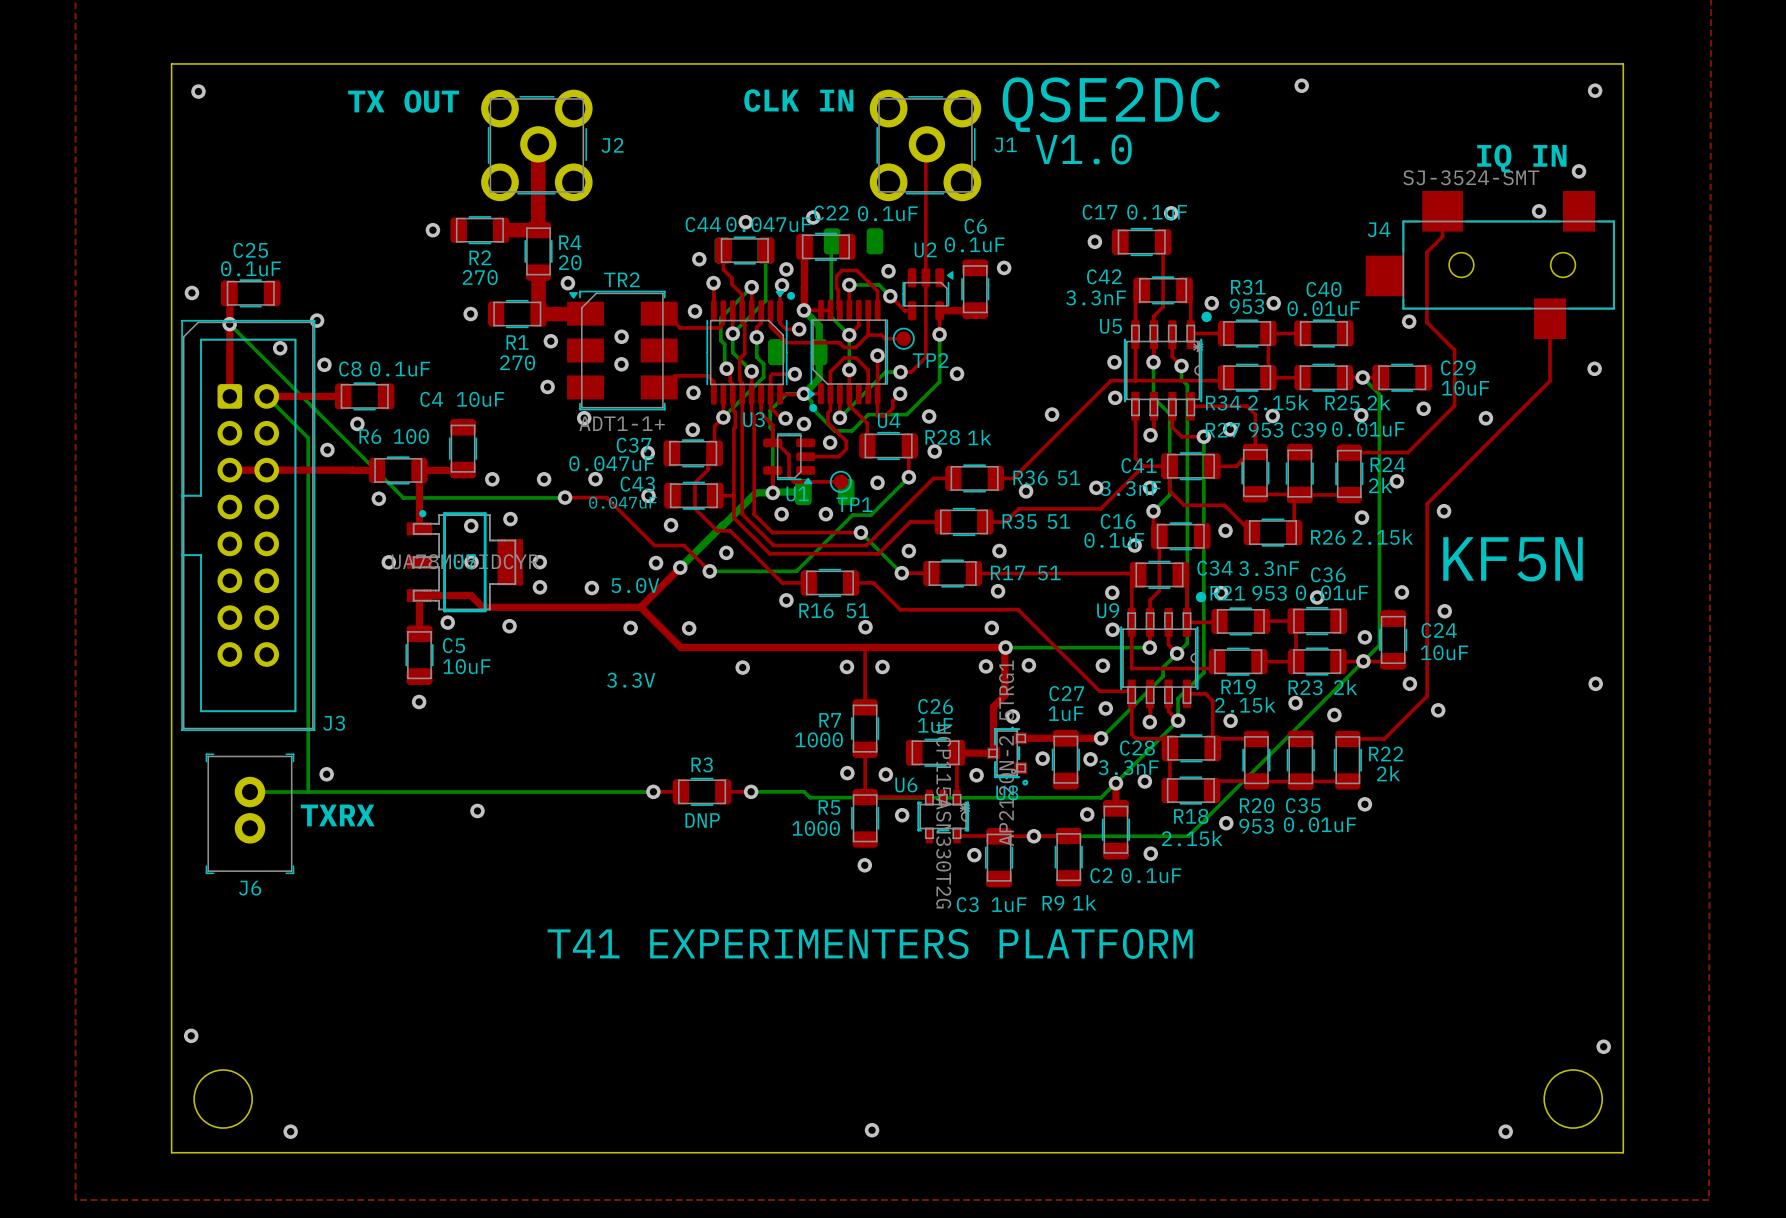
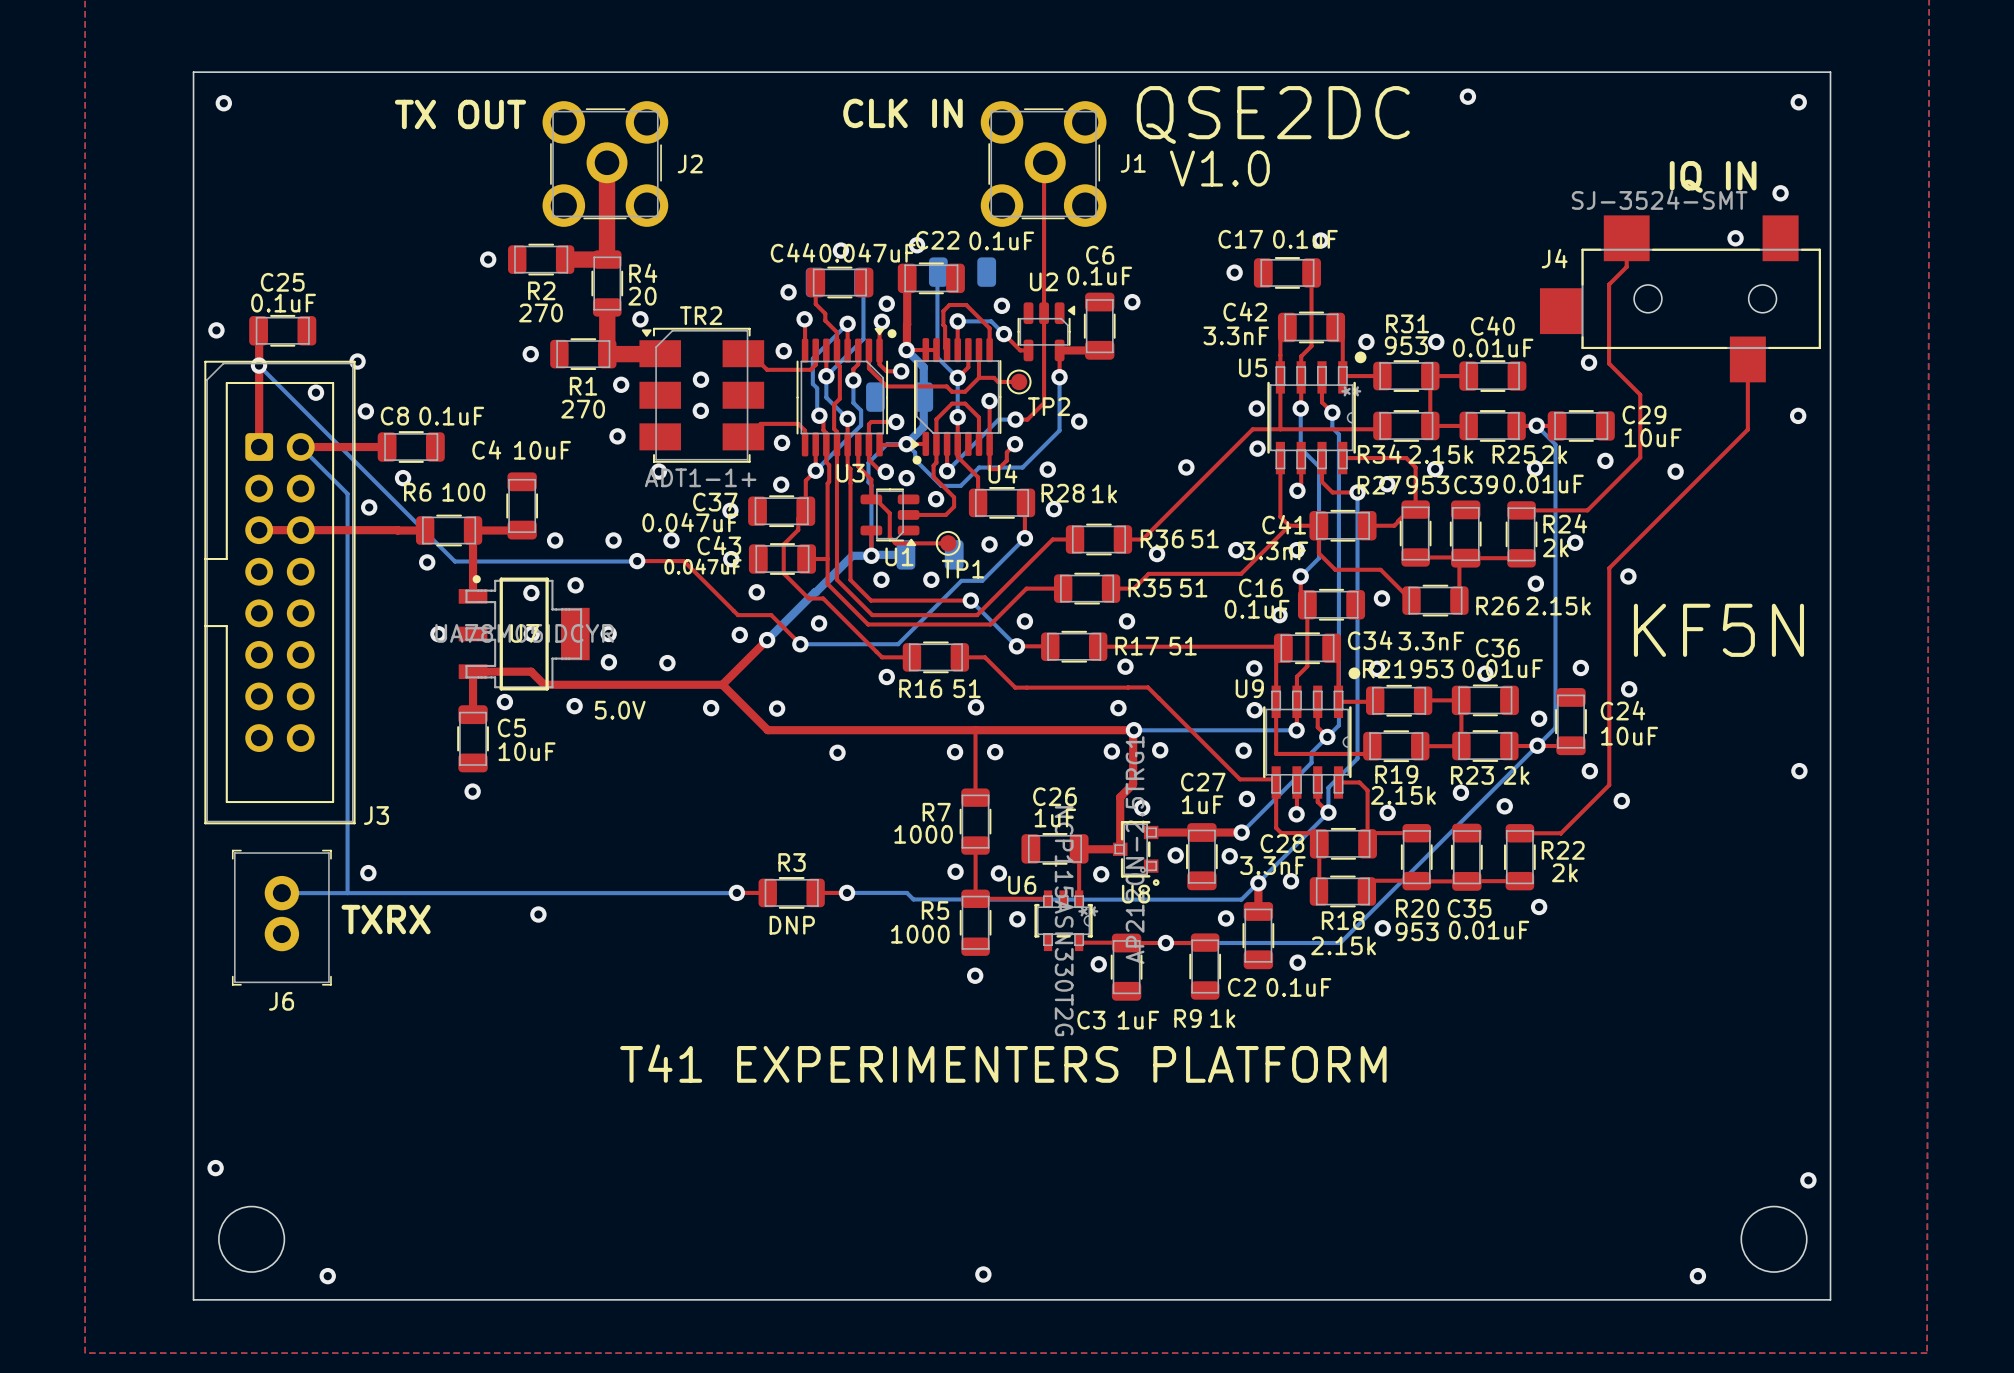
text position: 5.0V (635, 585) -> 5.0V (620, 710)
text: 3.3V (631, 680) -> none

